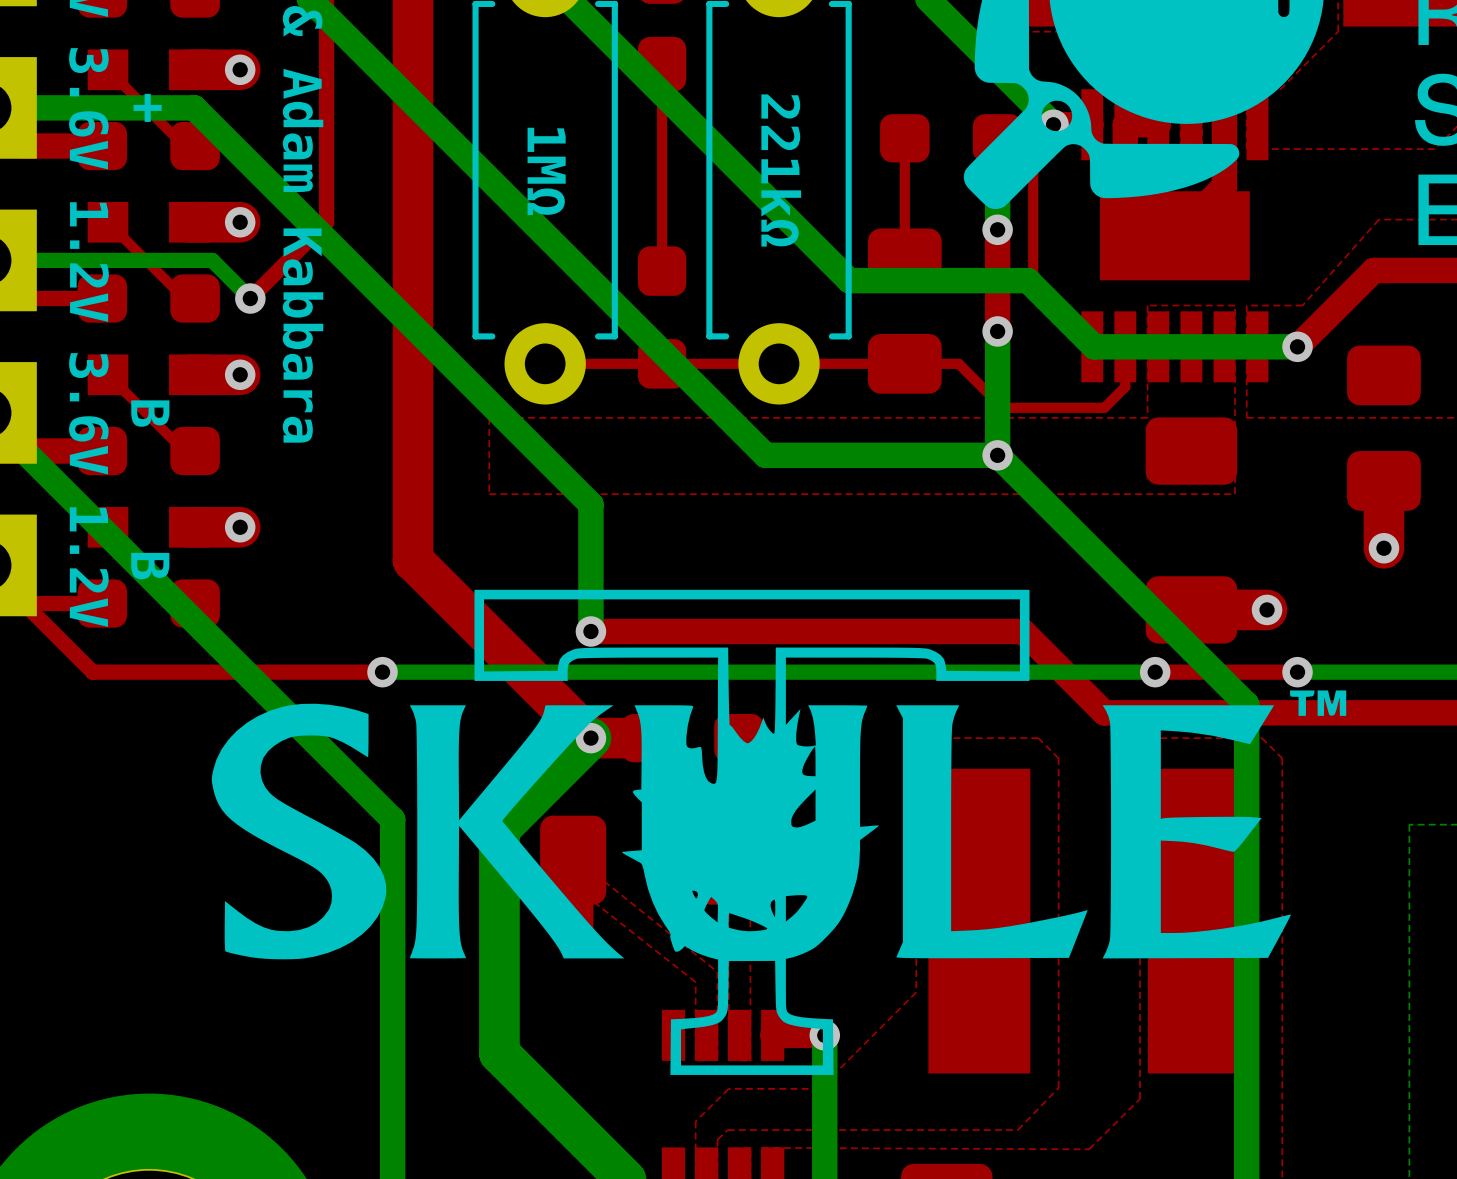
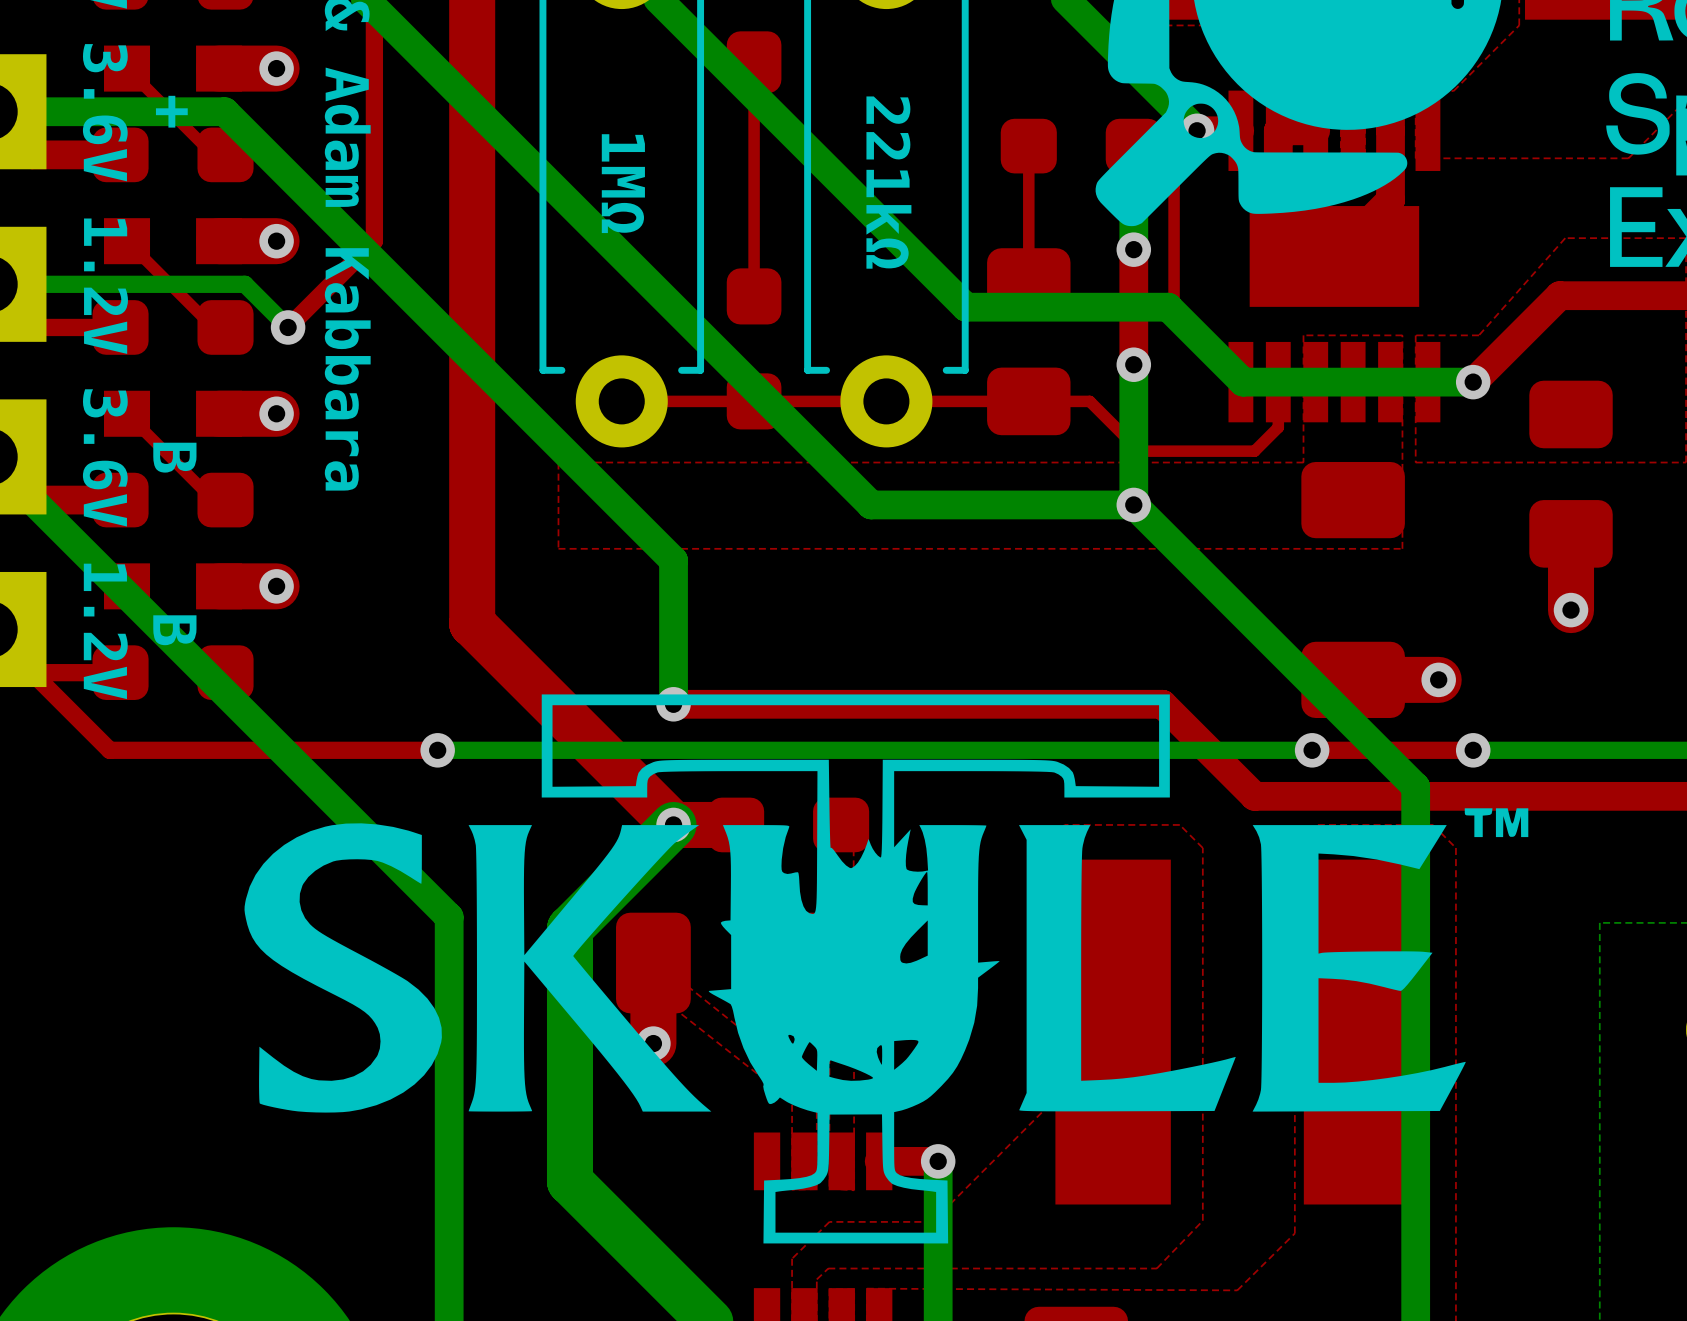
drawing position: (779, 832) -> (886, 968)

